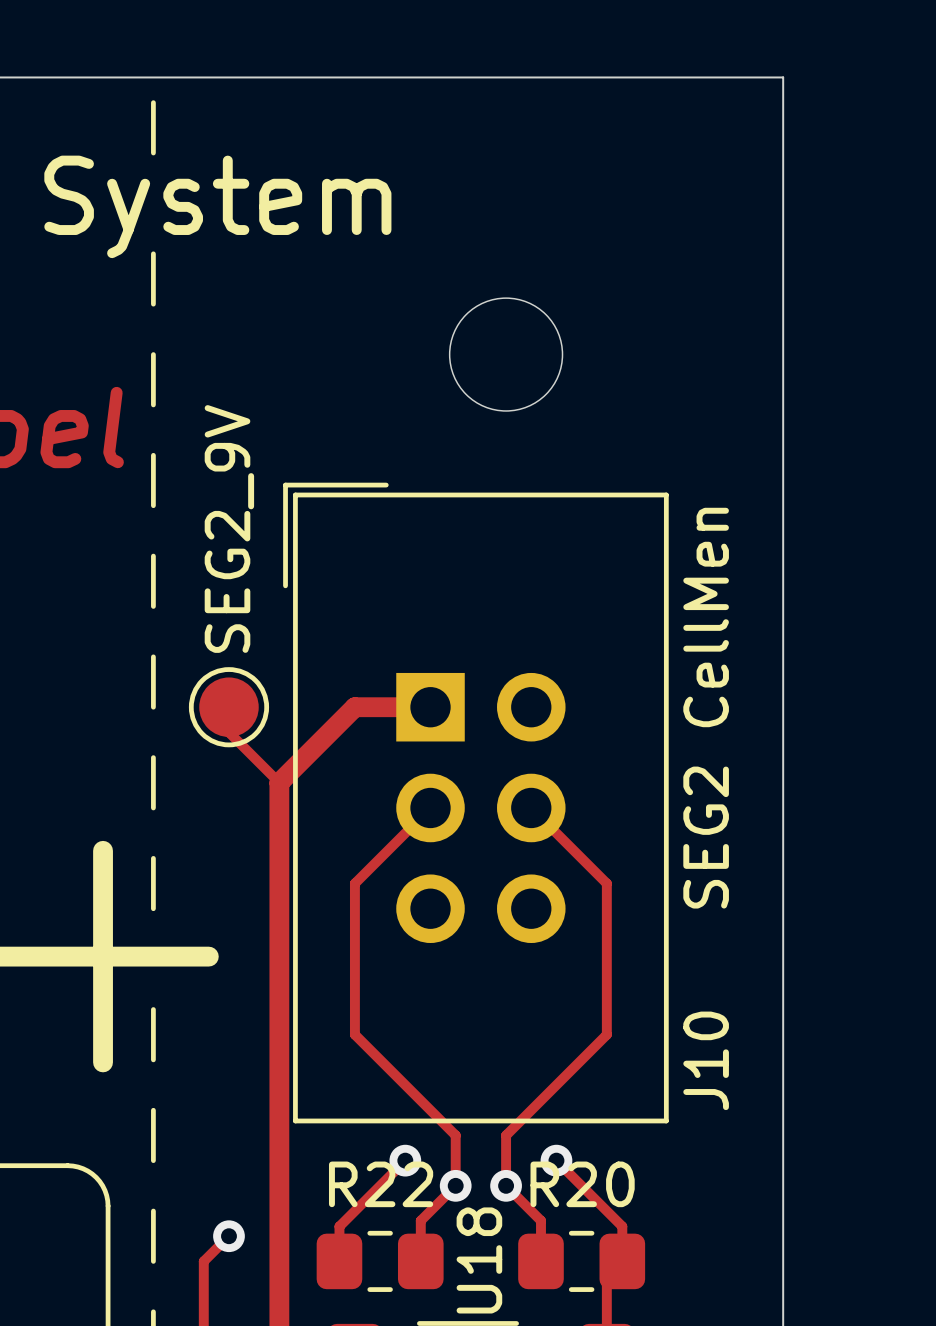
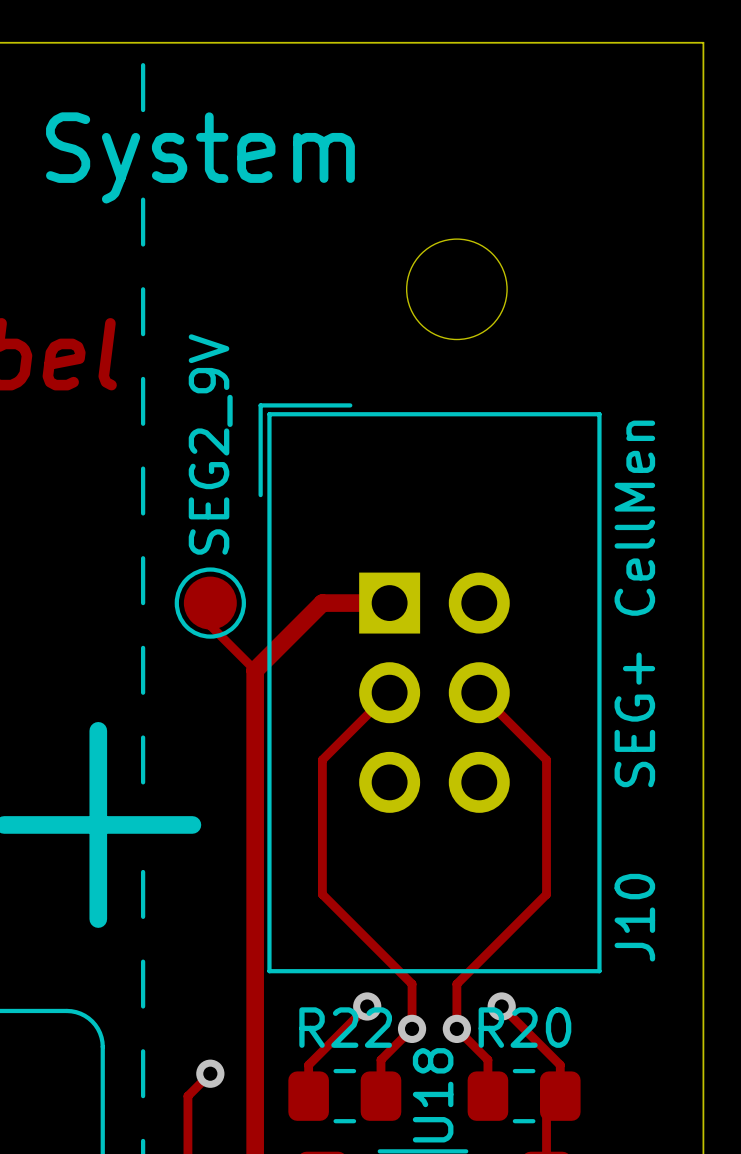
J10 value: SEG2 CellMen (706, 708) -> SEG+ CellMen (634, 603)

